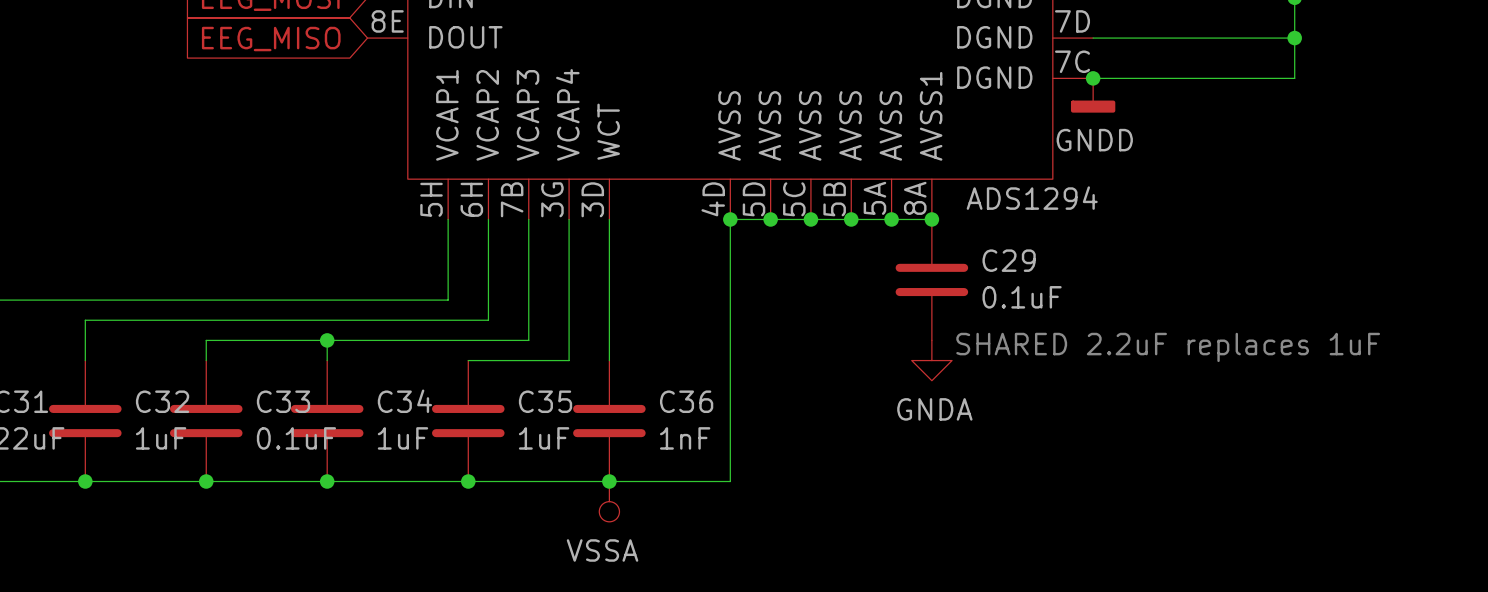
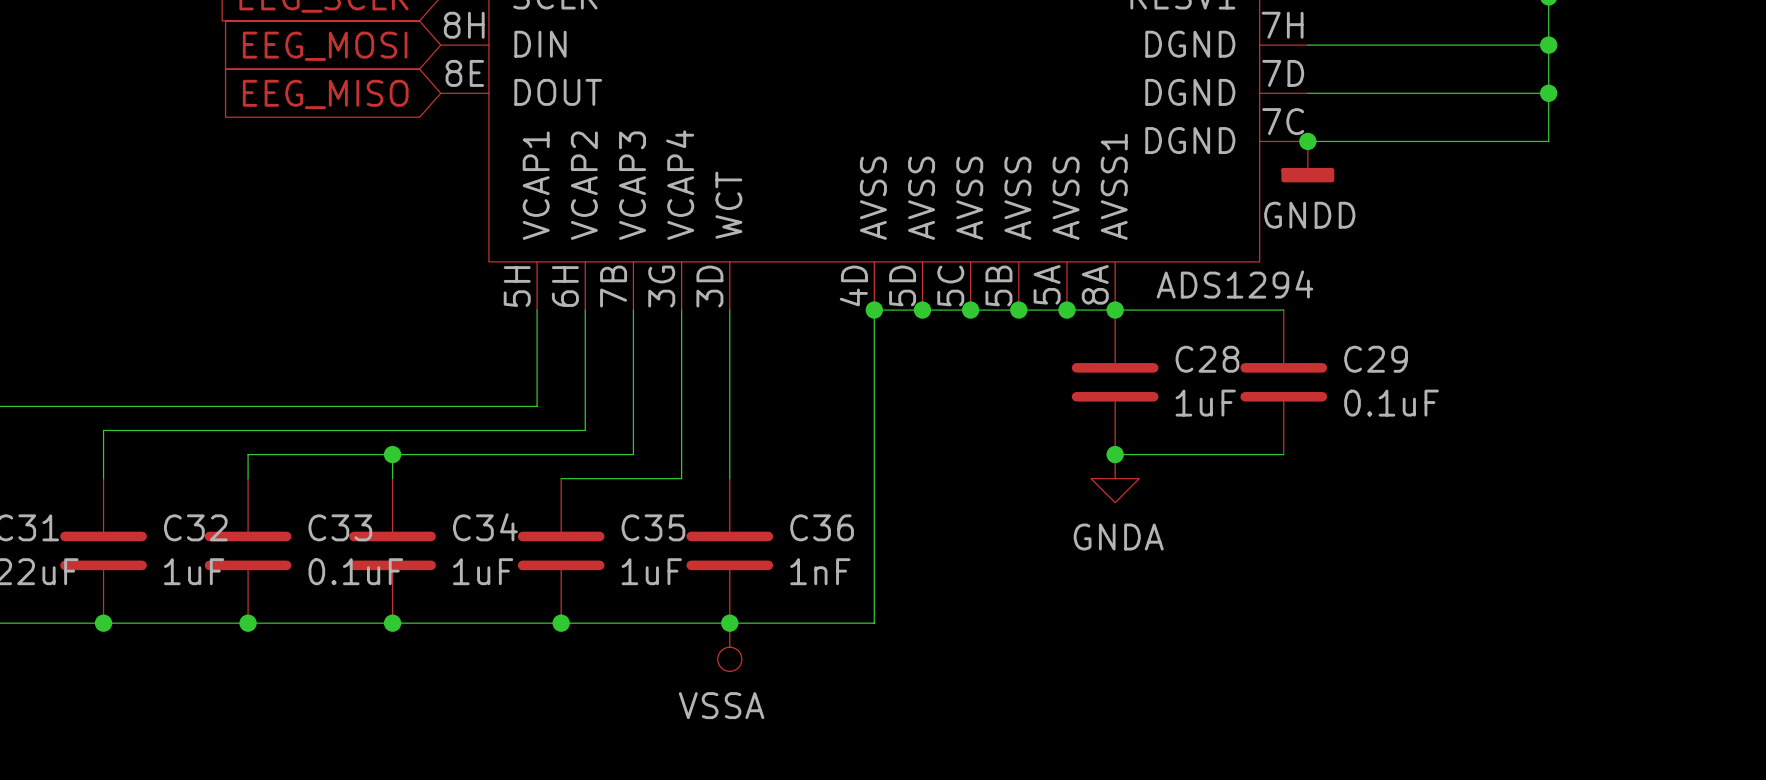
wire: none -> (1115, 310) (1283, 310)
C29 name: C29 (1009, 260) -> C28 (1207, 359)
C29: none -> 0.1uF (1283, 382)
C29 value: 0.1uF (1022, 297) -> 1uF (1205, 403)
wire: none -> (1115, 454) (1283, 454)
junction: none -> (1115, 454)
text: SHARED 2.2uF replaces 1uF (1168, 347) -> none

